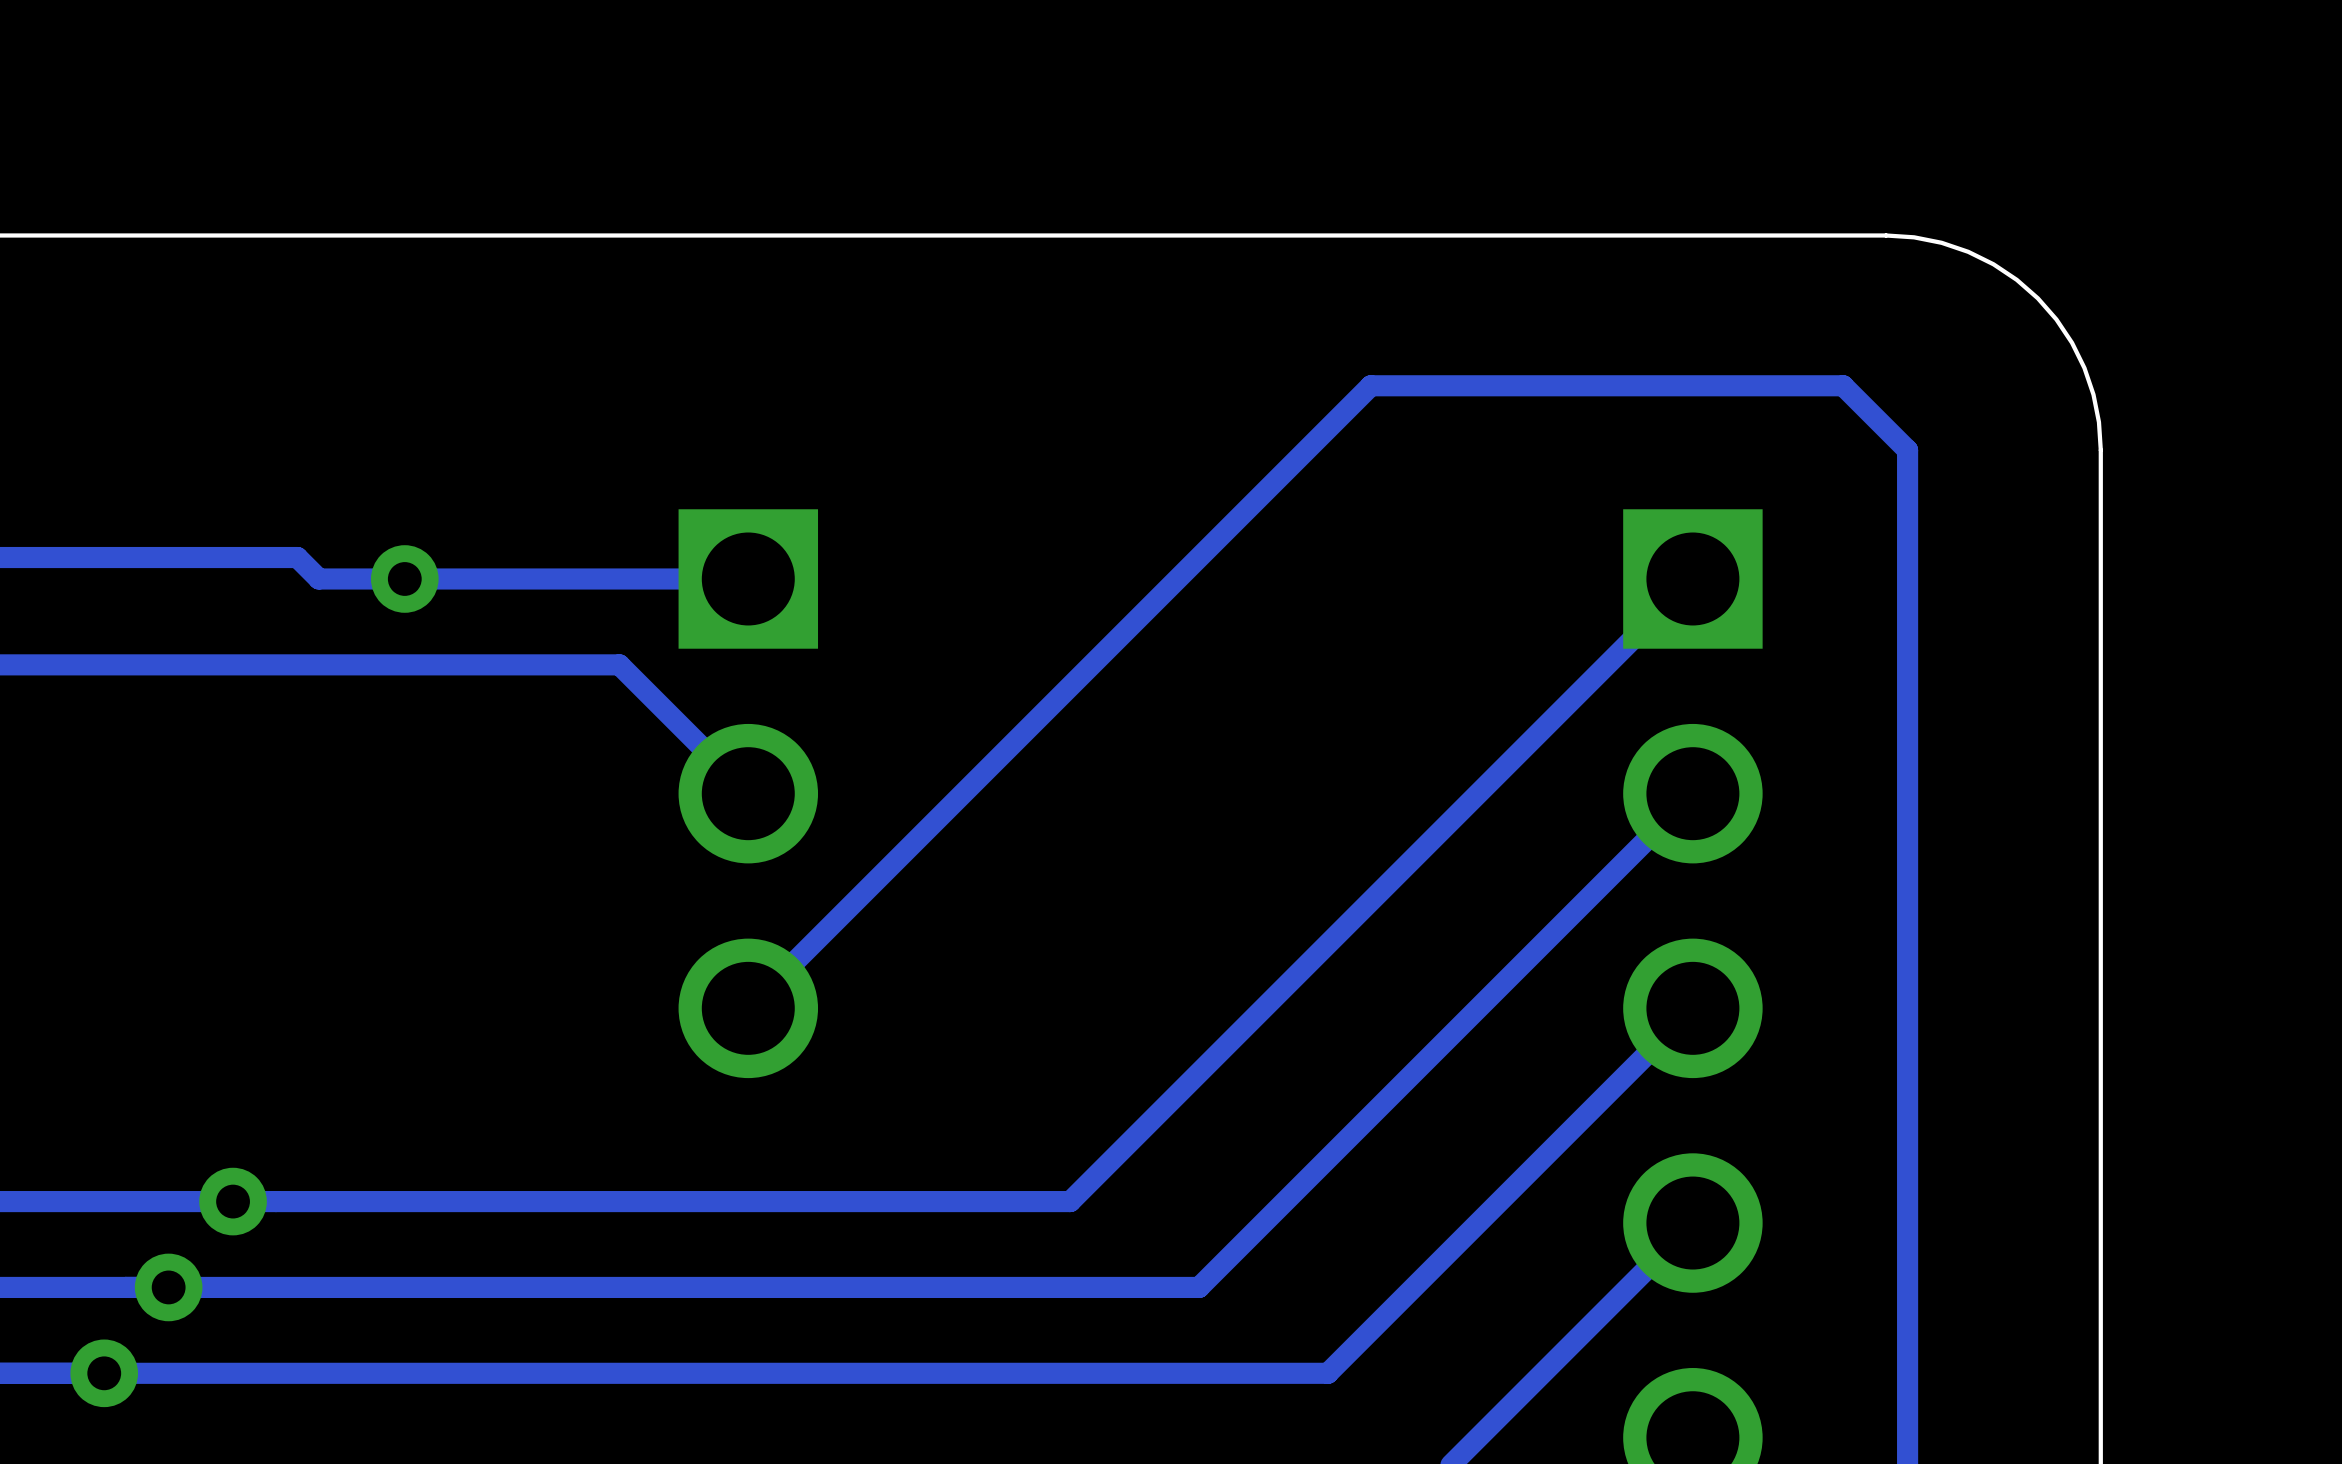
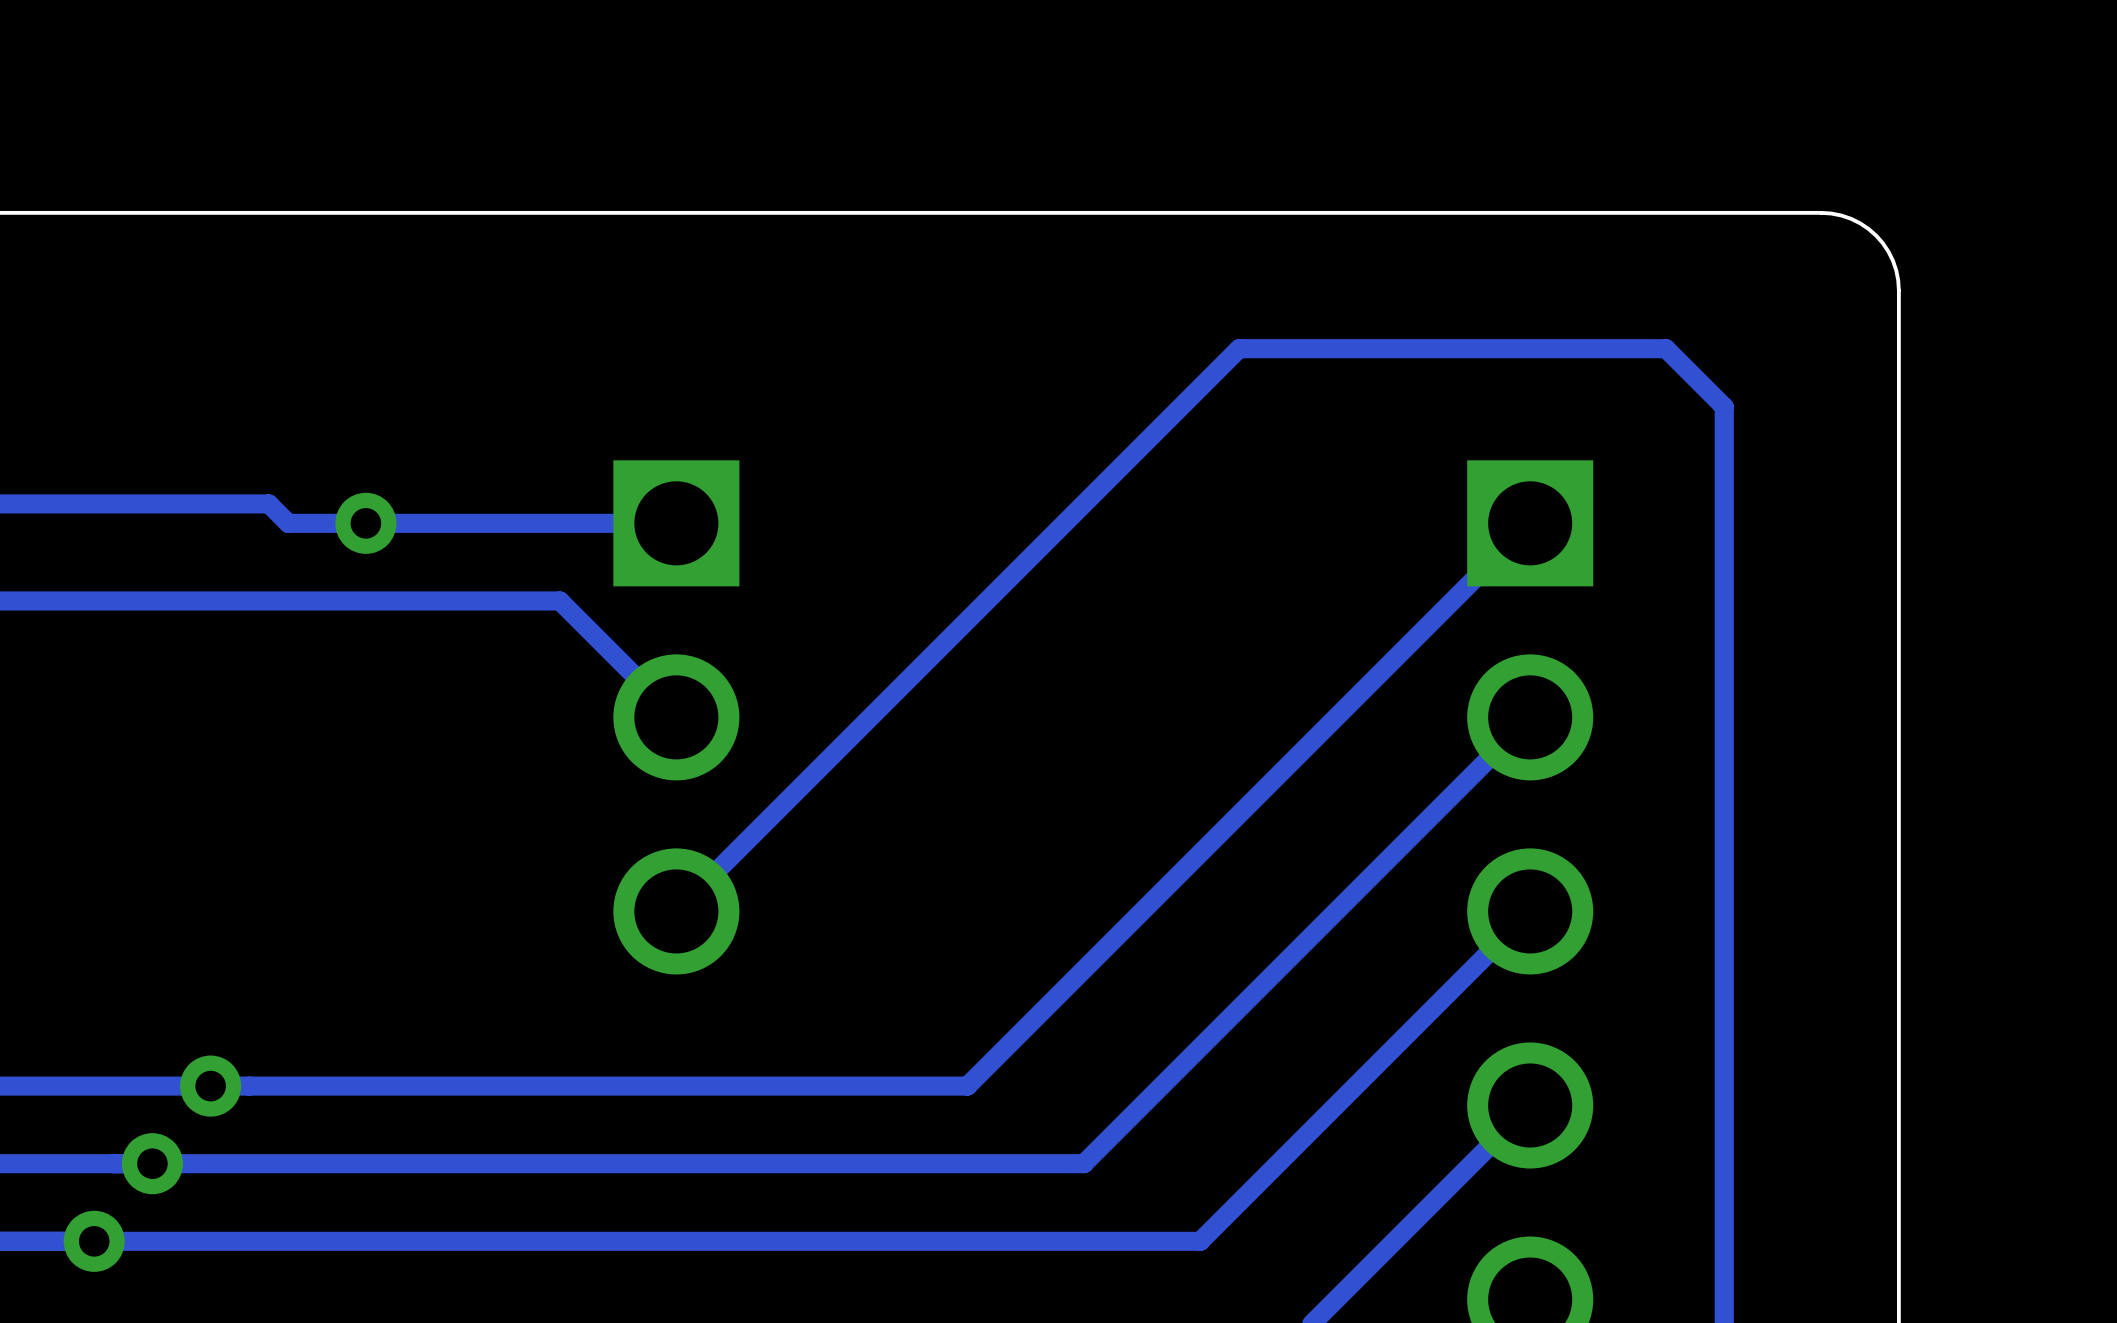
board edge: (1886, 235) (1914, 237) (1941, 242) (1968, 251) (1993, 264) (2016, 279) (2037, 298) (2056, 319) (2072, 342) (2084, 368) (2093, 394) (2098, 422) (2100, 450) -> (1704, 212) (1831, 213) (1850, 218) (1876, 235) (1888, 251) (1898, 280) (1898, 406)

